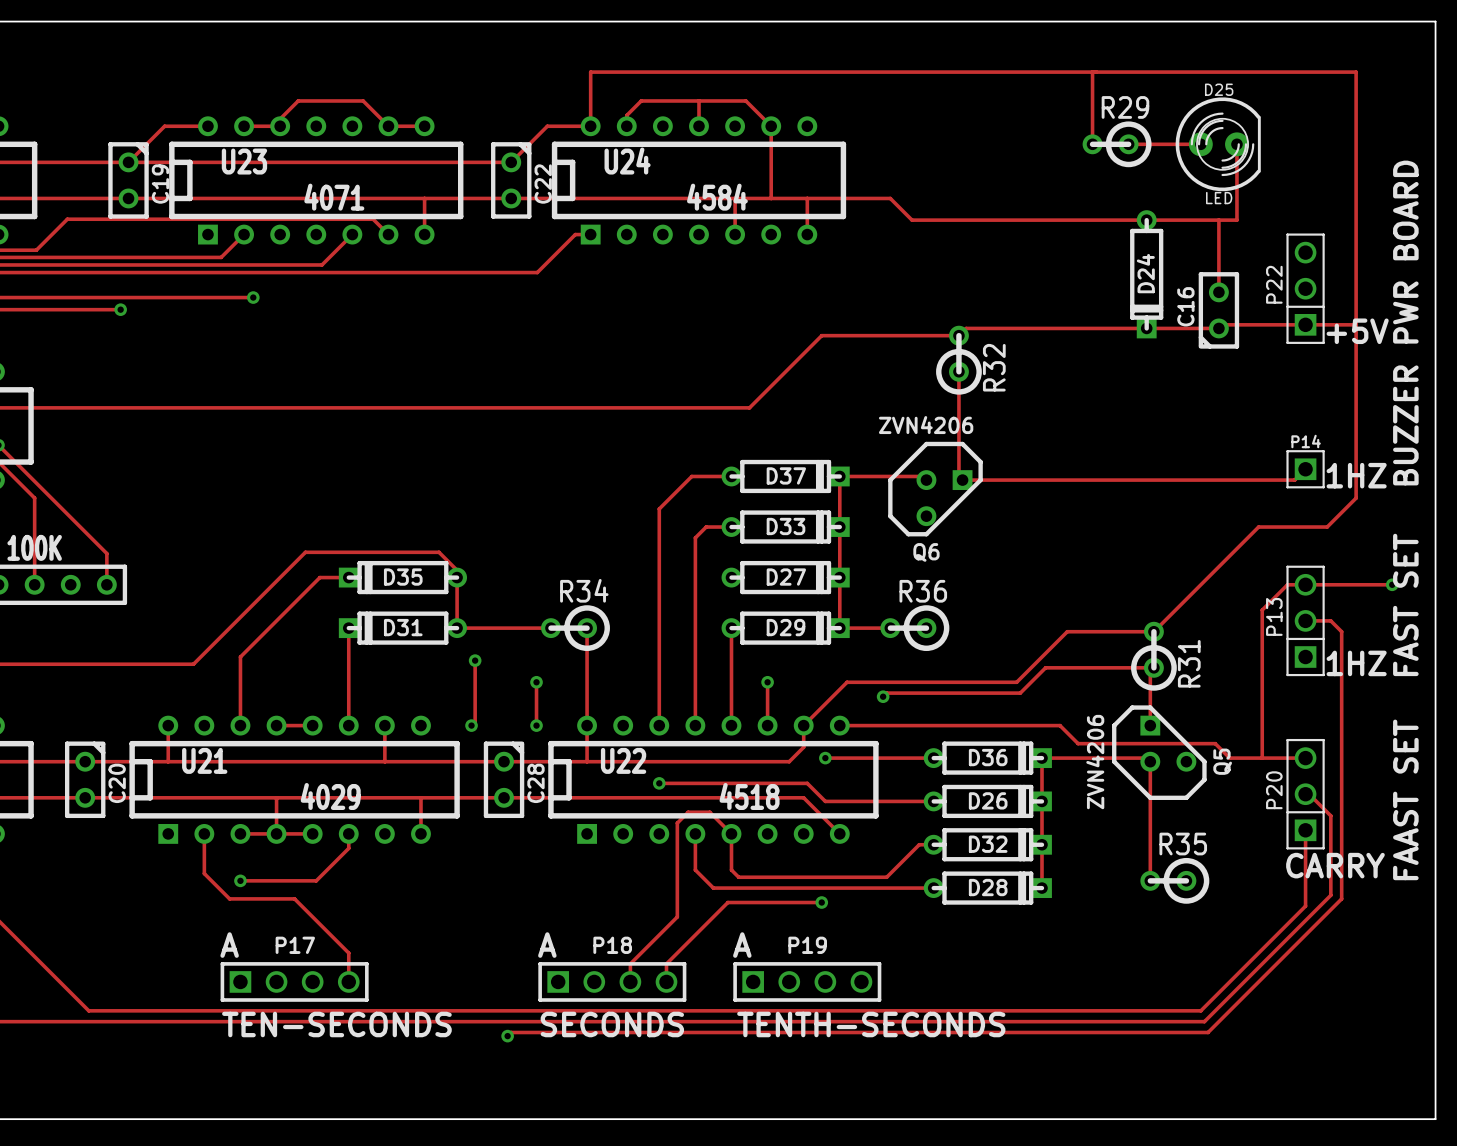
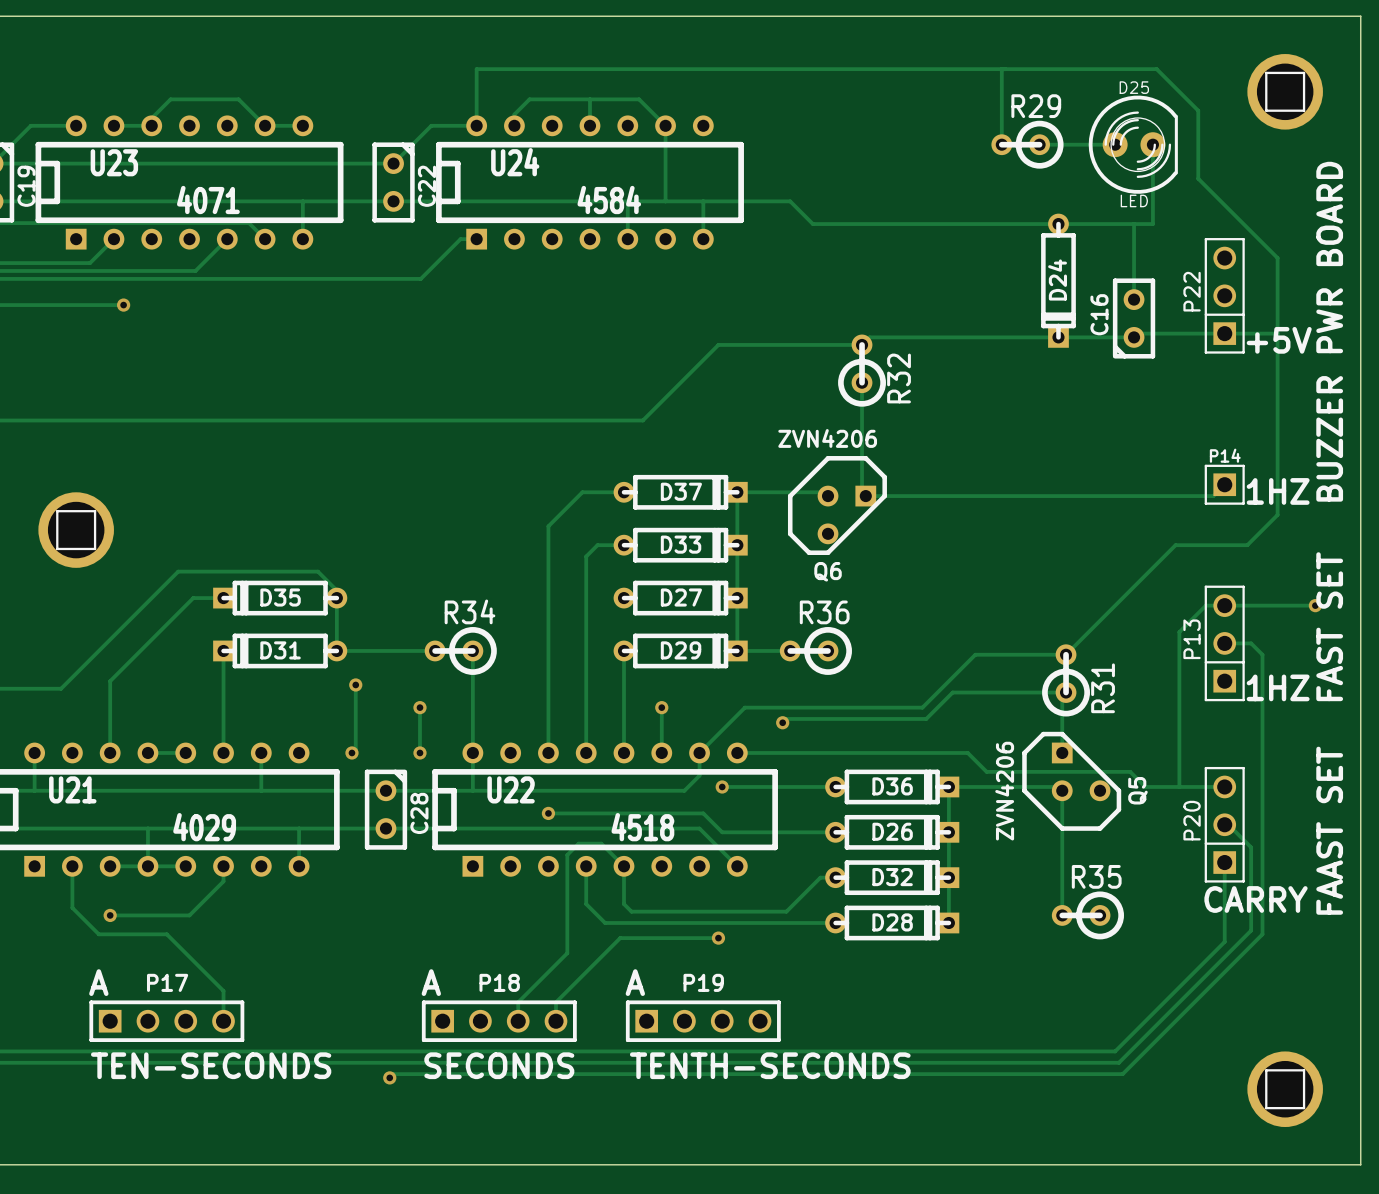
track: (1240, 72) (1356, 72) (1356, 252) -> (1156, 69) (1198, 110) (1198, 178) (1277, 258)
part: none -> (1285, 91)
part: none -> (76, 530)
part: none -> (1285, 1089)

